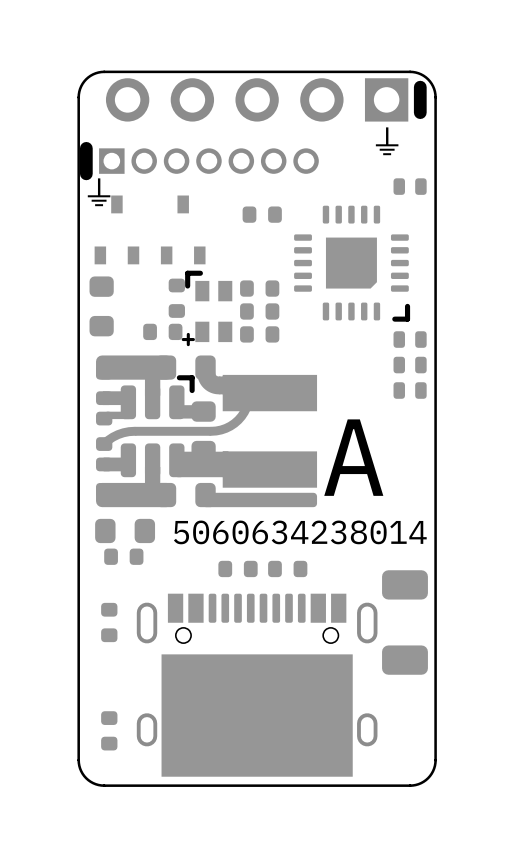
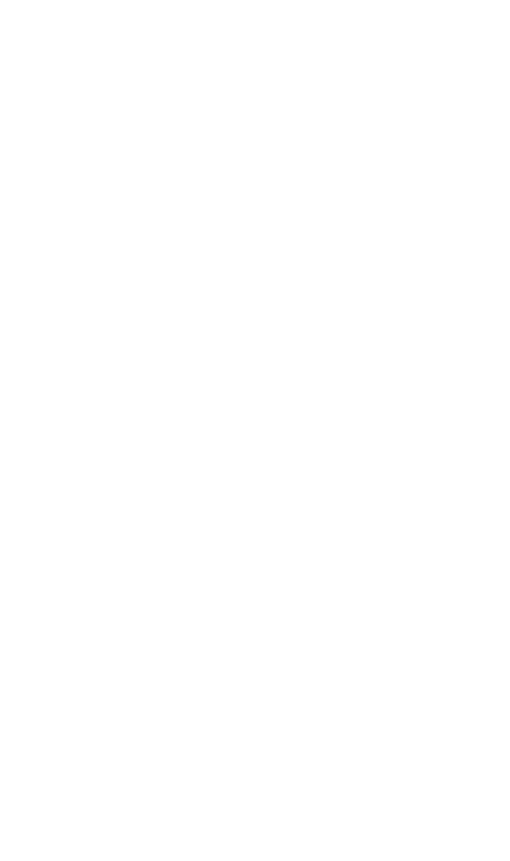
board edge: (104, 71) (410, 71) (423, 75) (433, 86) (435, 97) (435, 760) (431, 773) (421, 783) (410, 785) (104, 785) (90, 781) (81, 771) (78, 760) (78, 97) (80, 88) (86, 79) (95, 73) (104, 71) -> none
line: (420, 87) (420, 112) -> none
part: (257, 99) -> none
text: ⏚ (387, 141) -> none
line: (86, 148) (86, 173) -> none
part: (208, 161) -> none
part: (410, 186) -> none
text: ⏚ (99, 192) -> none
part: (262, 214) -> none
part: (116, 229) -> none
part: (183, 229) -> none
part: (352, 263) -> none
part: (259, 288) -> none
part: (176, 298) -> none
part: (101, 306) -> none
part: (206, 308) -> none
part: (259, 311) -> none
part: (162, 331) -> none
part: (259, 334) -> none
part: (410, 339) -> none
part: (410, 365) -> none
part: (410, 390) -> none
part: (206, 431) -> none
text: A (353, 457) -> none
part: (125, 530) -> none
text: 5060634238014 (300, 532) -> none
part: (123, 556) -> none
part: (238, 568) -> none
part: (287, 568) -> none
part: (109, 622) -> none
part: (404, 622) -> none
part: (257, 685) -> none
part: (109, 730) -> none

